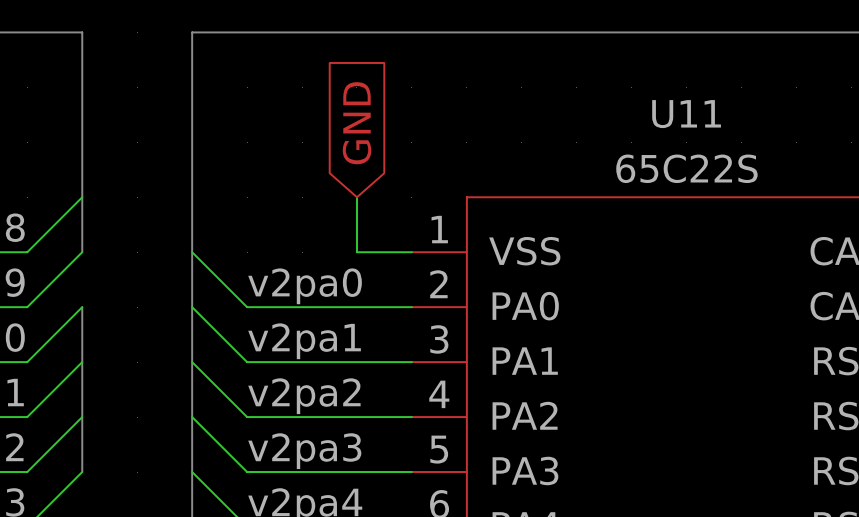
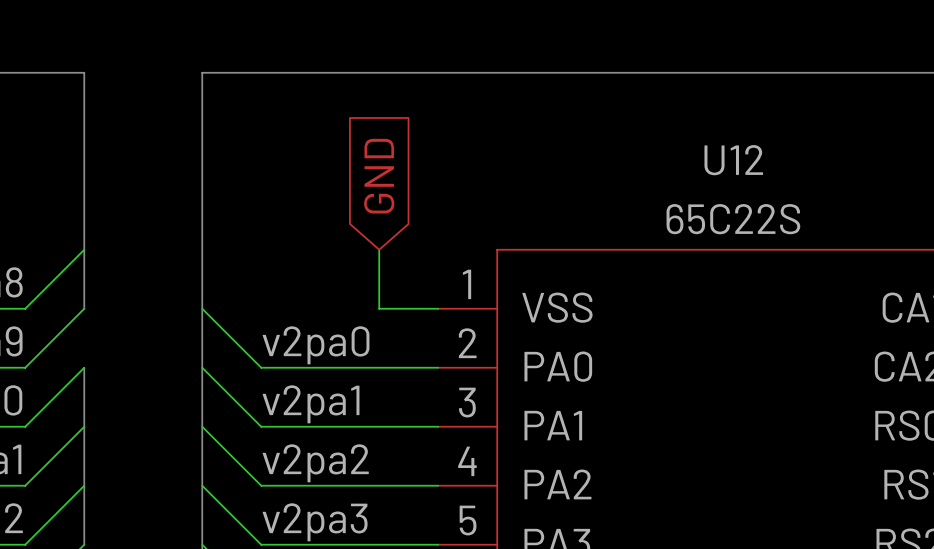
U11 name: U11 (686, 114) -> U12 (733, 160)

